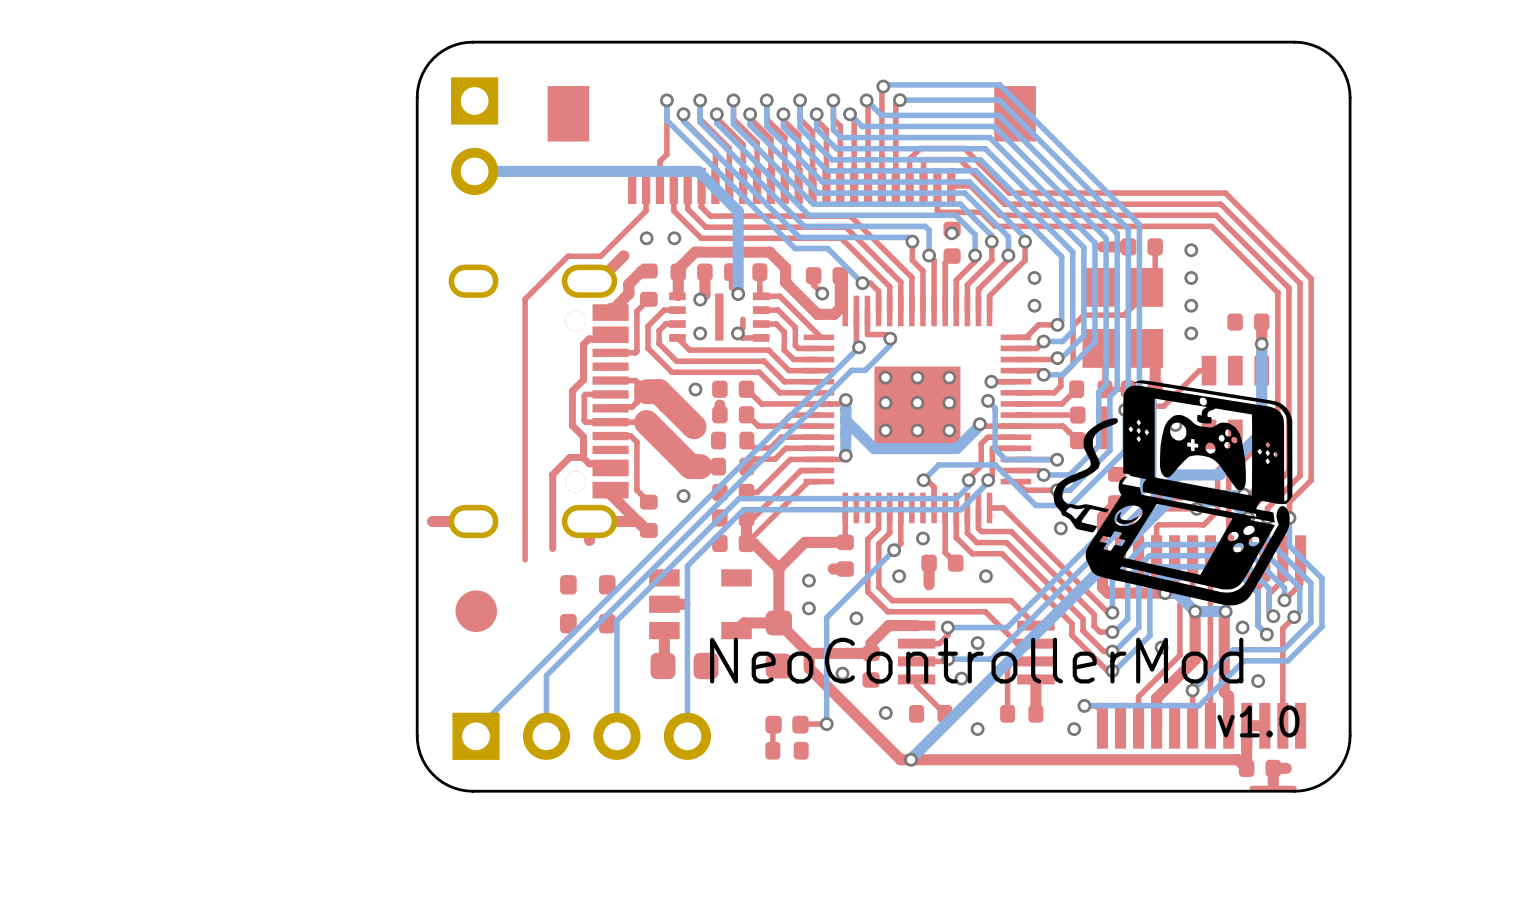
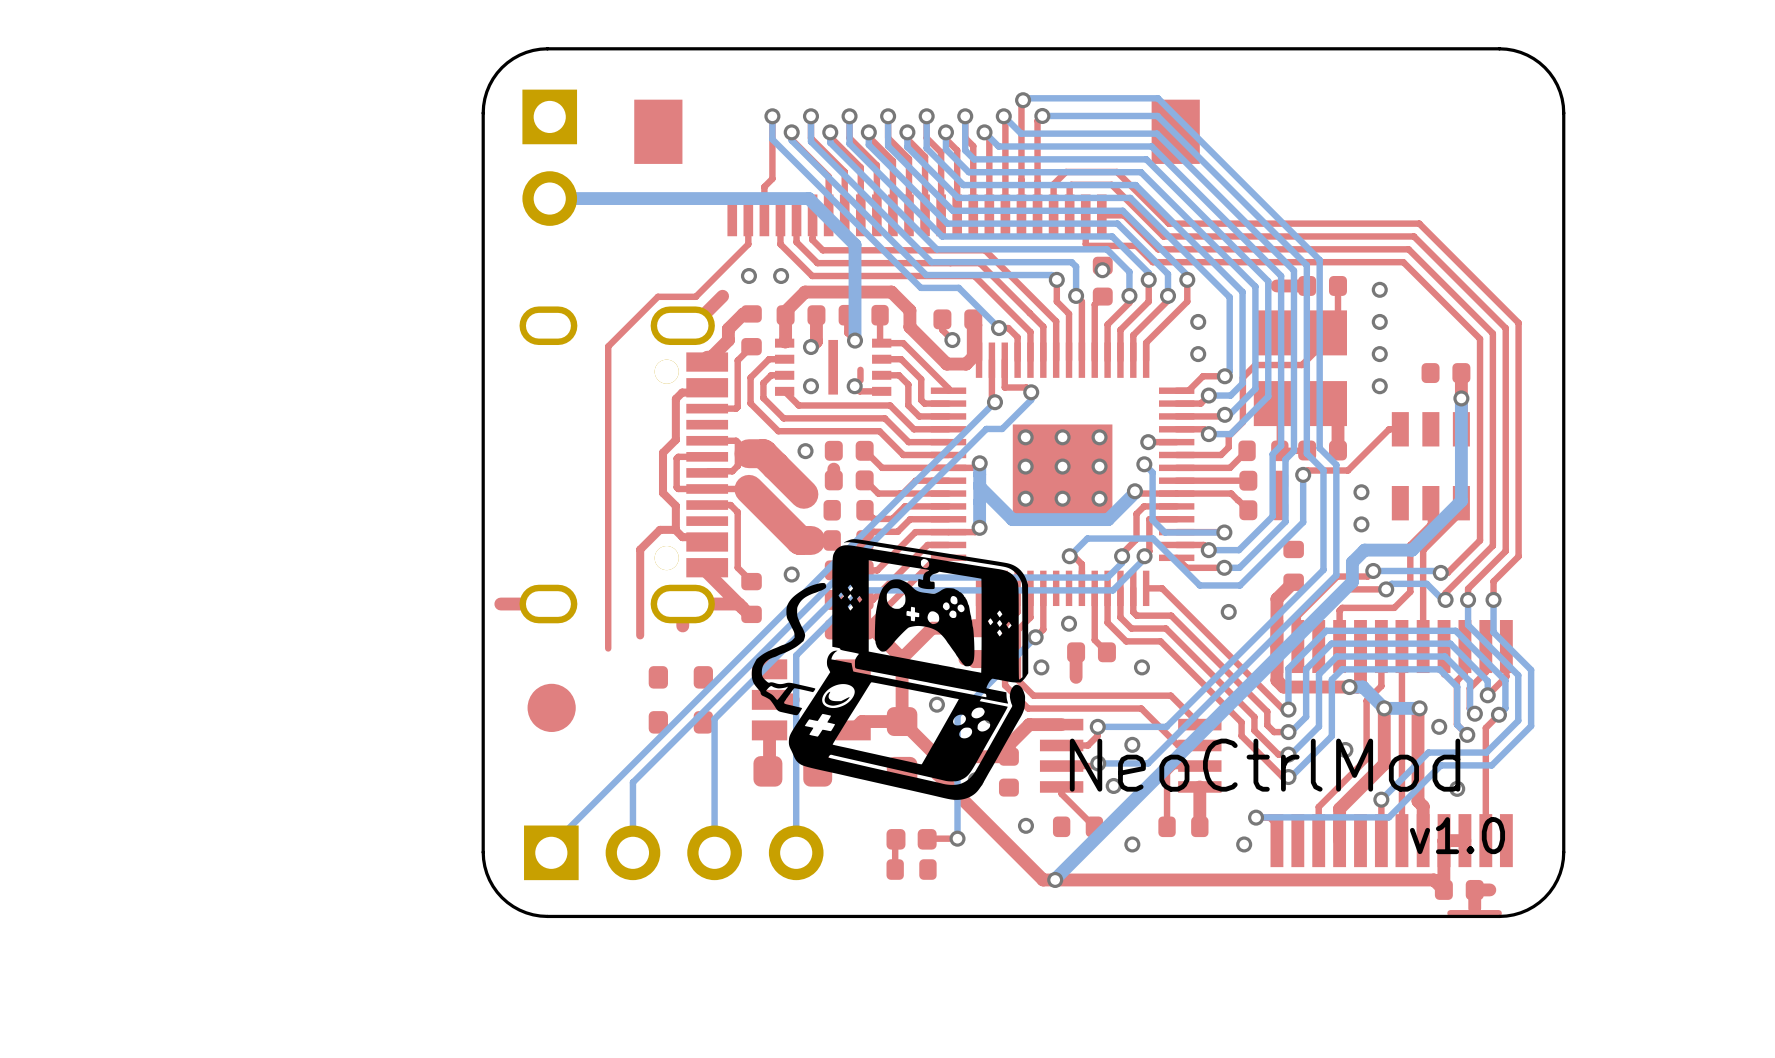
drawing position: (1202, 452) -> (924, 622)
drawing position: (1085, 475) -> (788, 649)
drawing position: (1189, 492) -> (908, 669)
drawing position: (1127, 518) -> (837, 698)
text: NeoControllerMod (976, 660) -> NeoCtrlMod (1265, 765)

